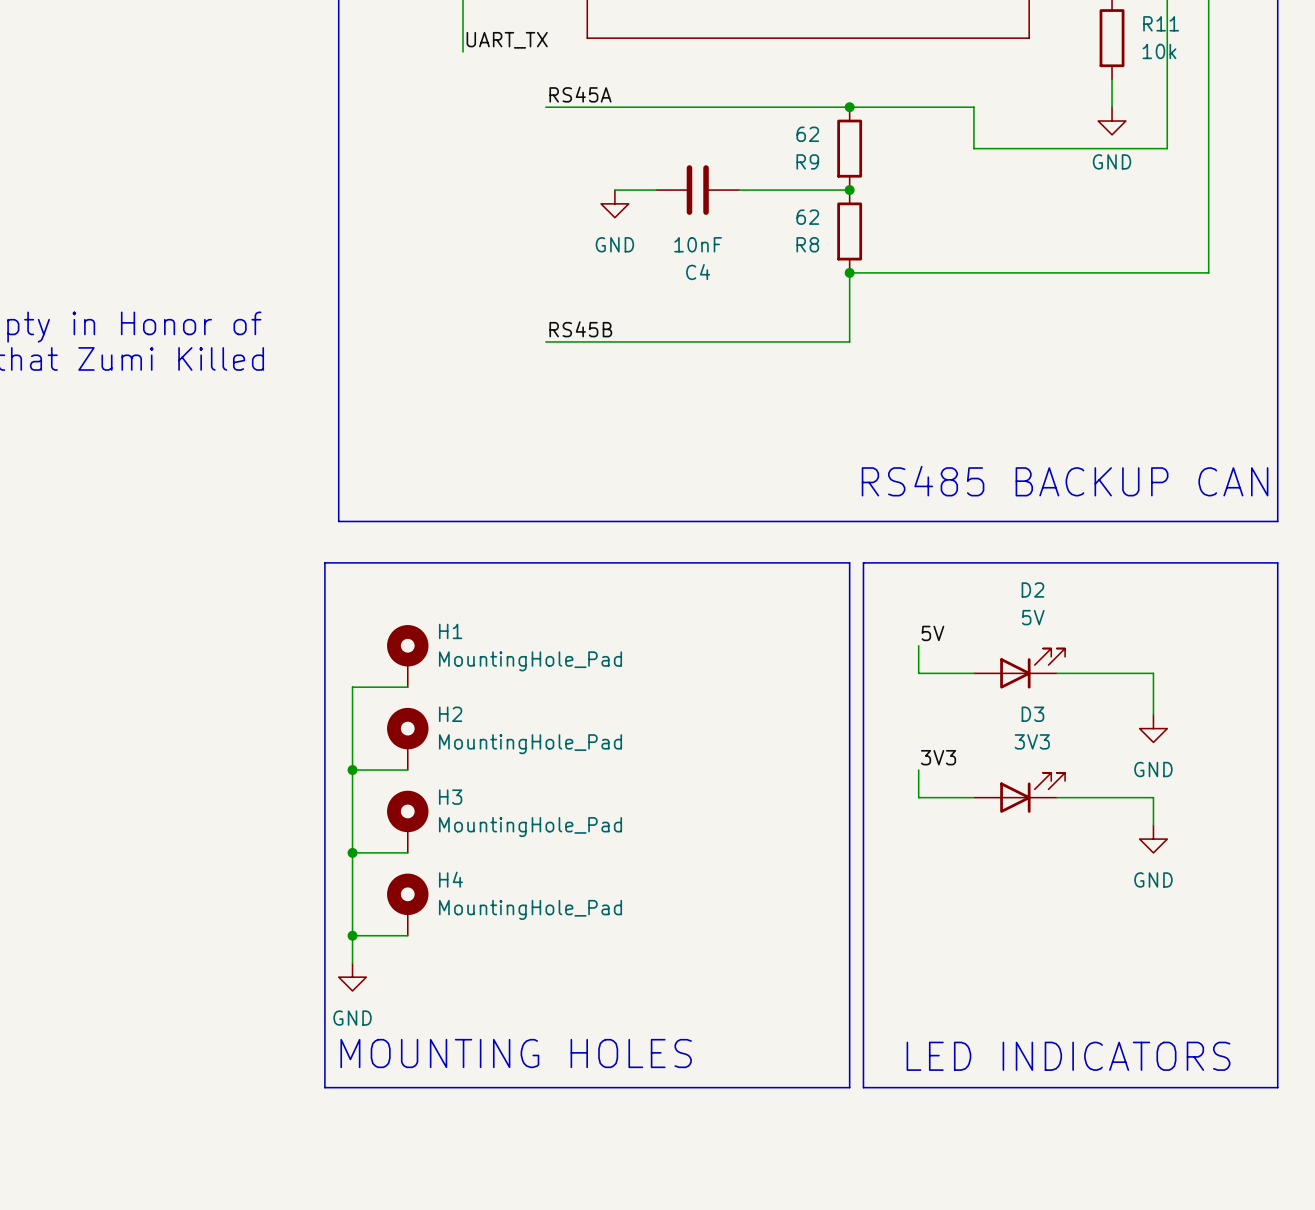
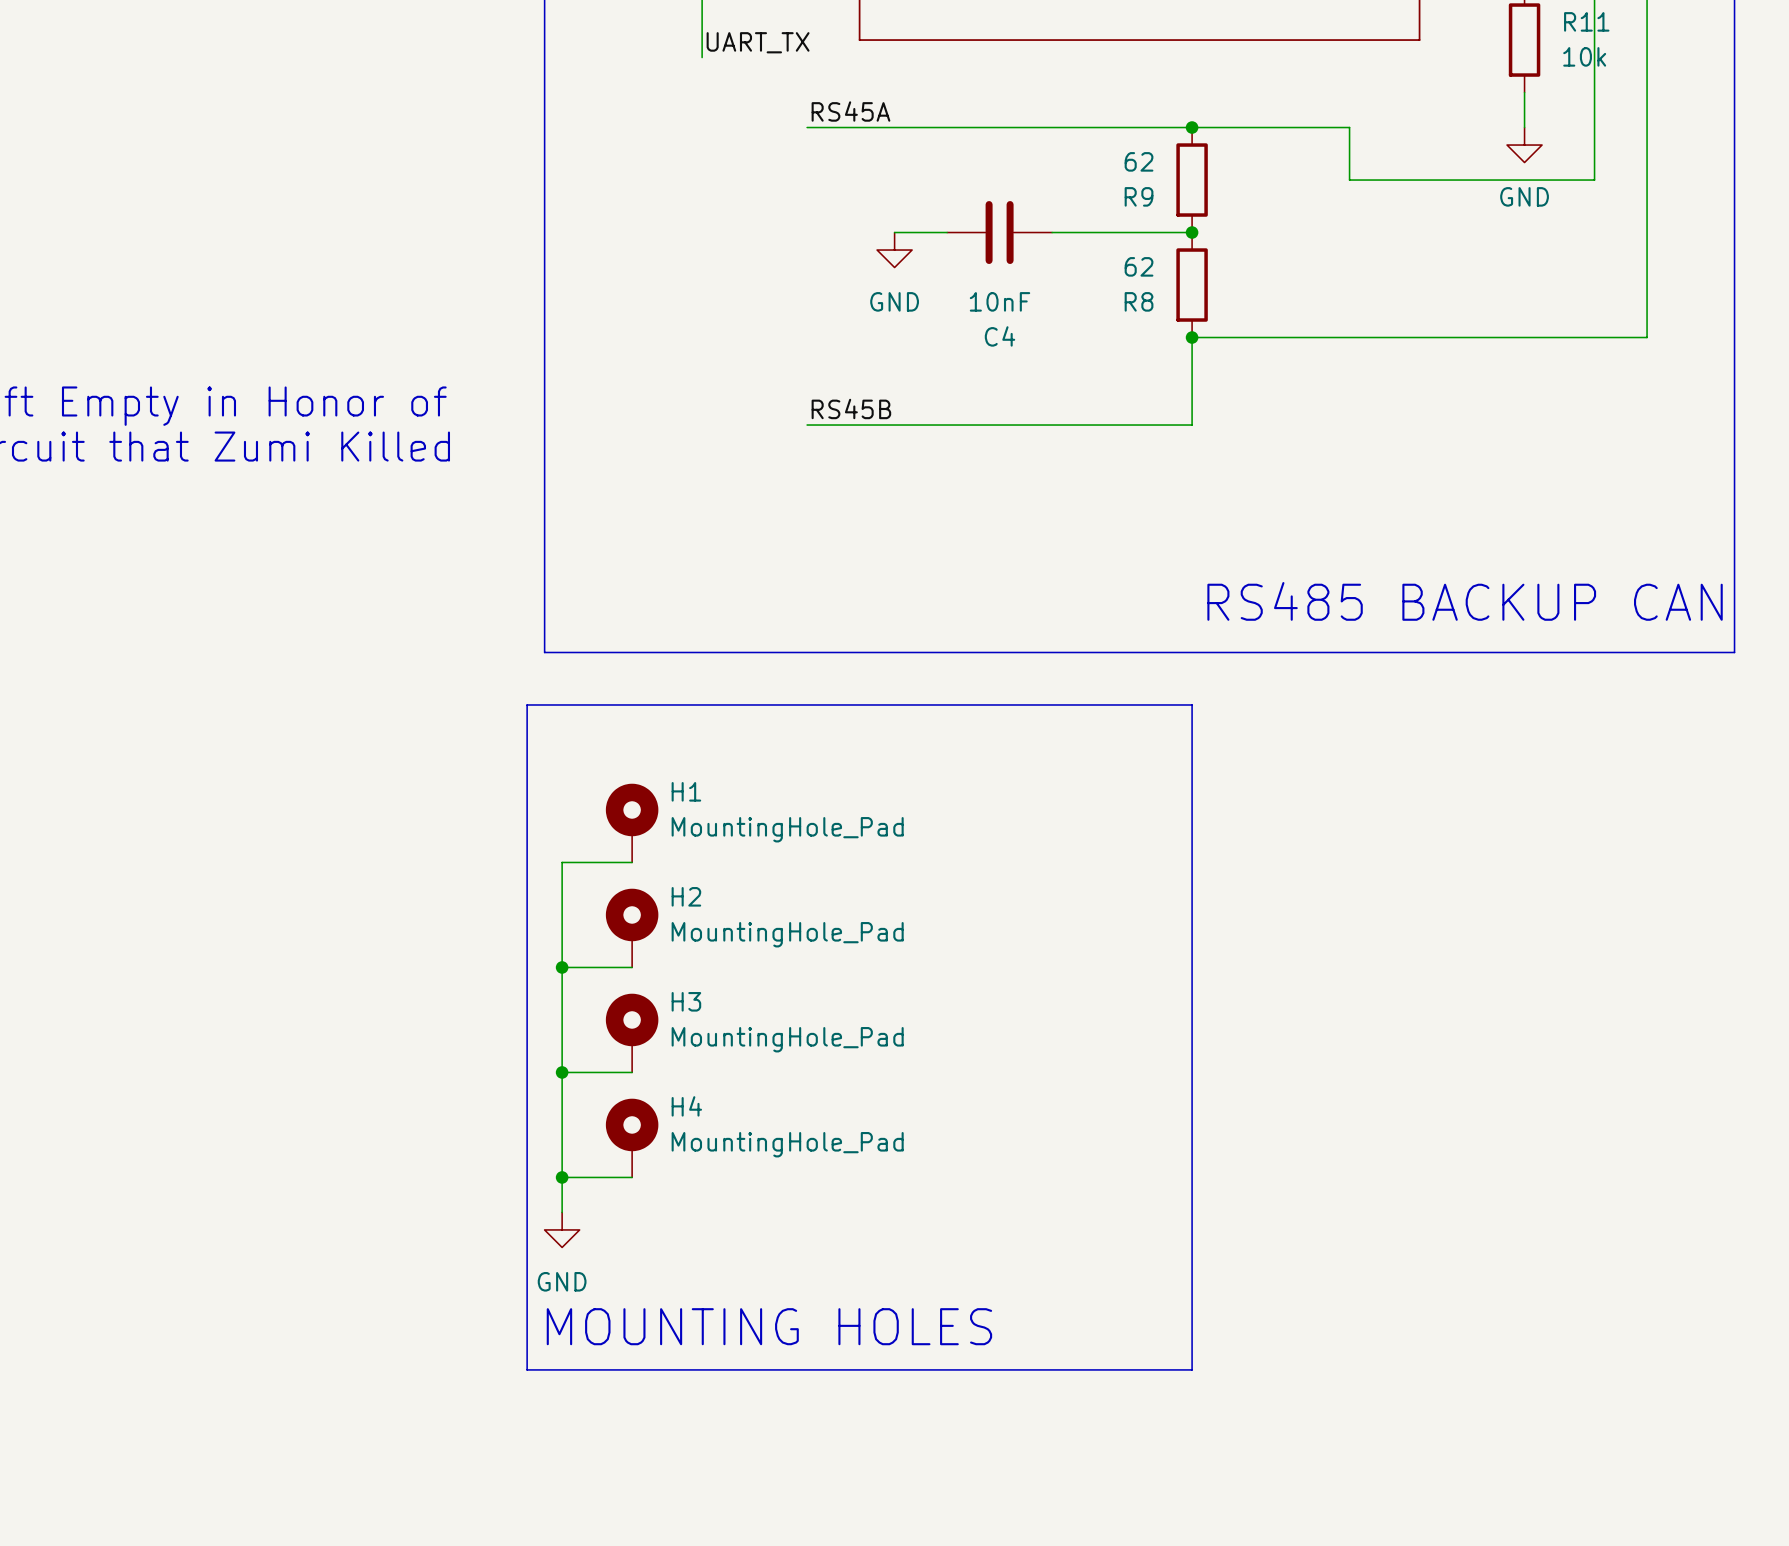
line: (863, 562) (1277, 562) (1277, 1087) (863, 1087) (863, 562) -> none
label: 5V (932, 633) -> none
wire: (918, 645) (918, 673) (973, 673) -> none
D2: 5V (1019, 668) -> none
wire: (1056, 673) (1153, 673) (1153, 714) -> none
power symbol: GND (1153, 728) -> none
label: 3V3 (938, 757) -> none
wire: (918, 770) (918, 797) (973, 797) -> none
D3: 3V3 (1019, 792) -> none
wire: (1056, 797) (1153, 797) (1153, 825) -> none
power symbol: GND (1153, 839) -> none
text: LED INDICATORS (1068, 1056) -> none

